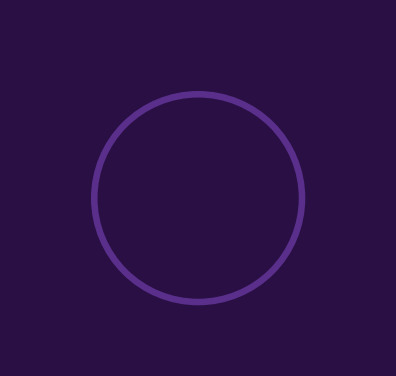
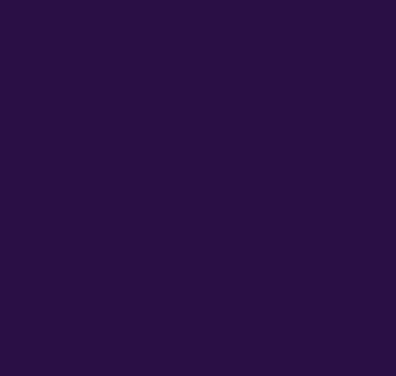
drawing: [90, 90, 306, 306] -> none

